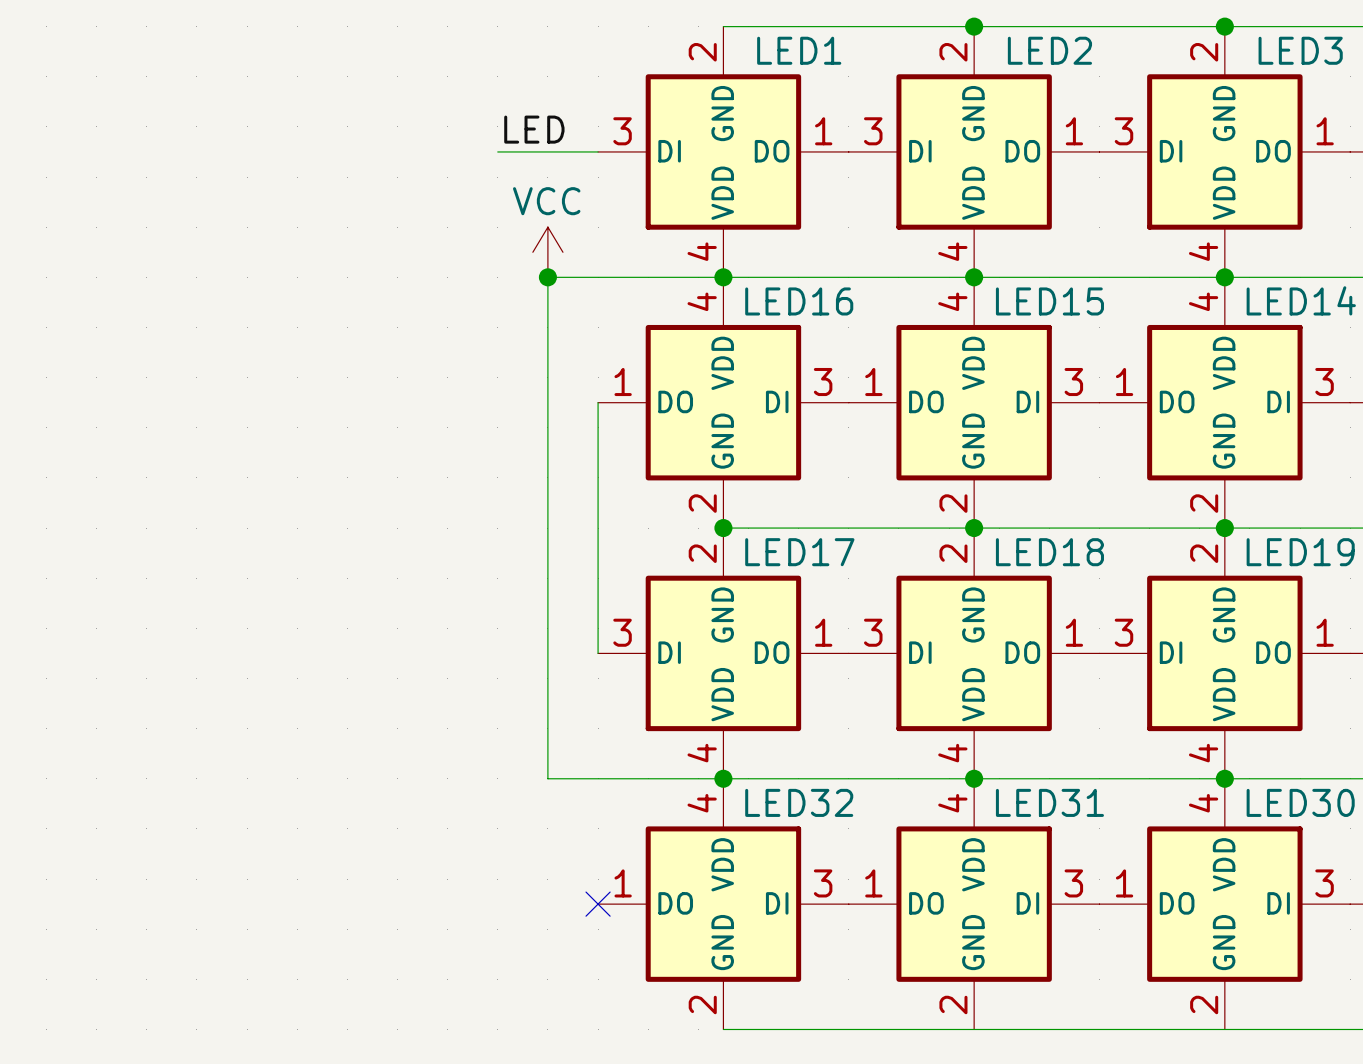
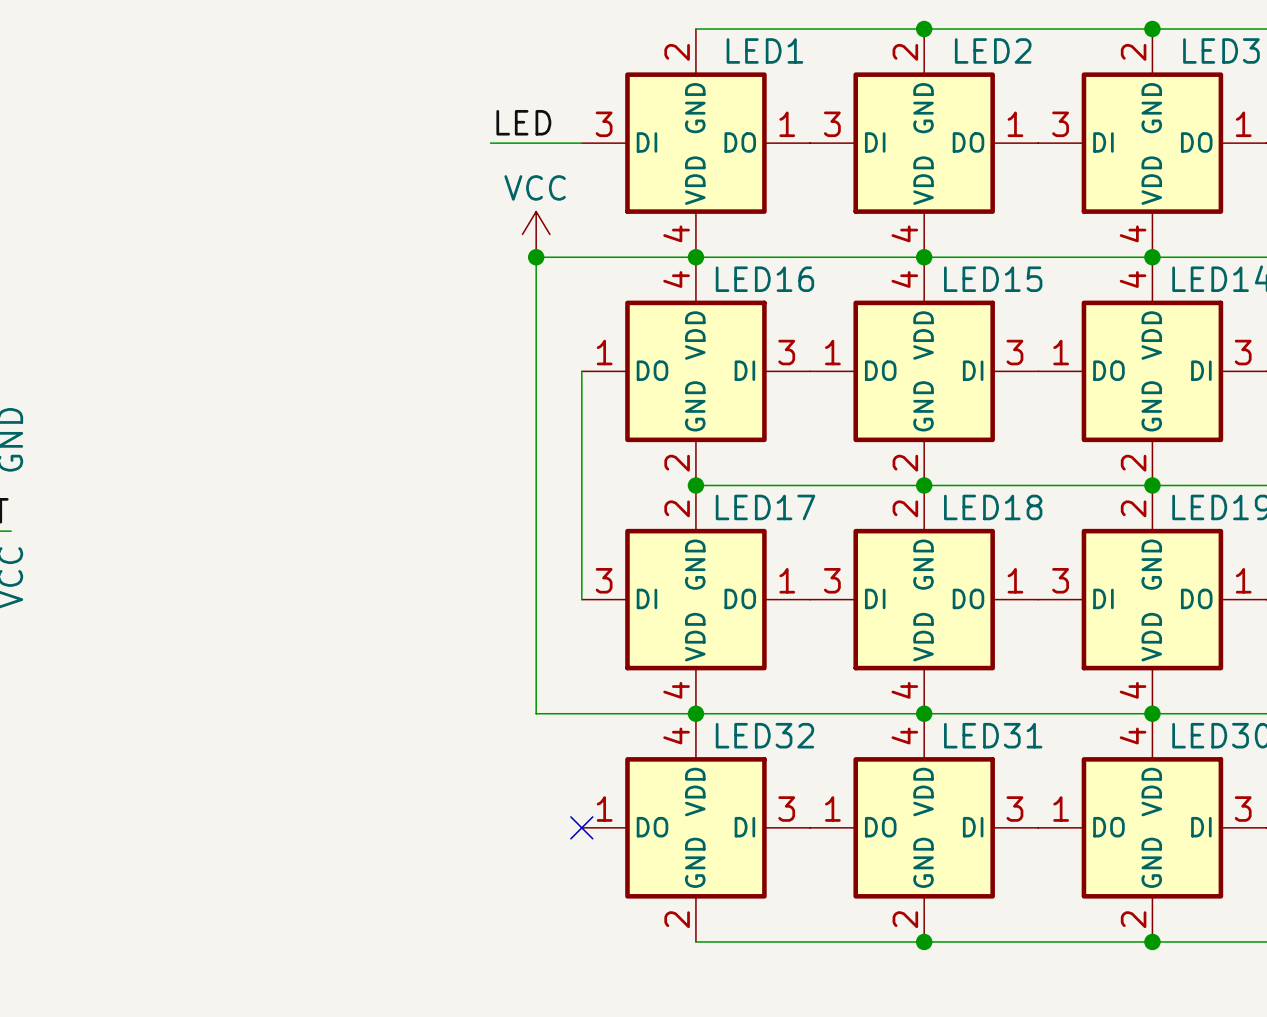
junction: none -> (924, 941)
junction: none -> (1152, 941)

